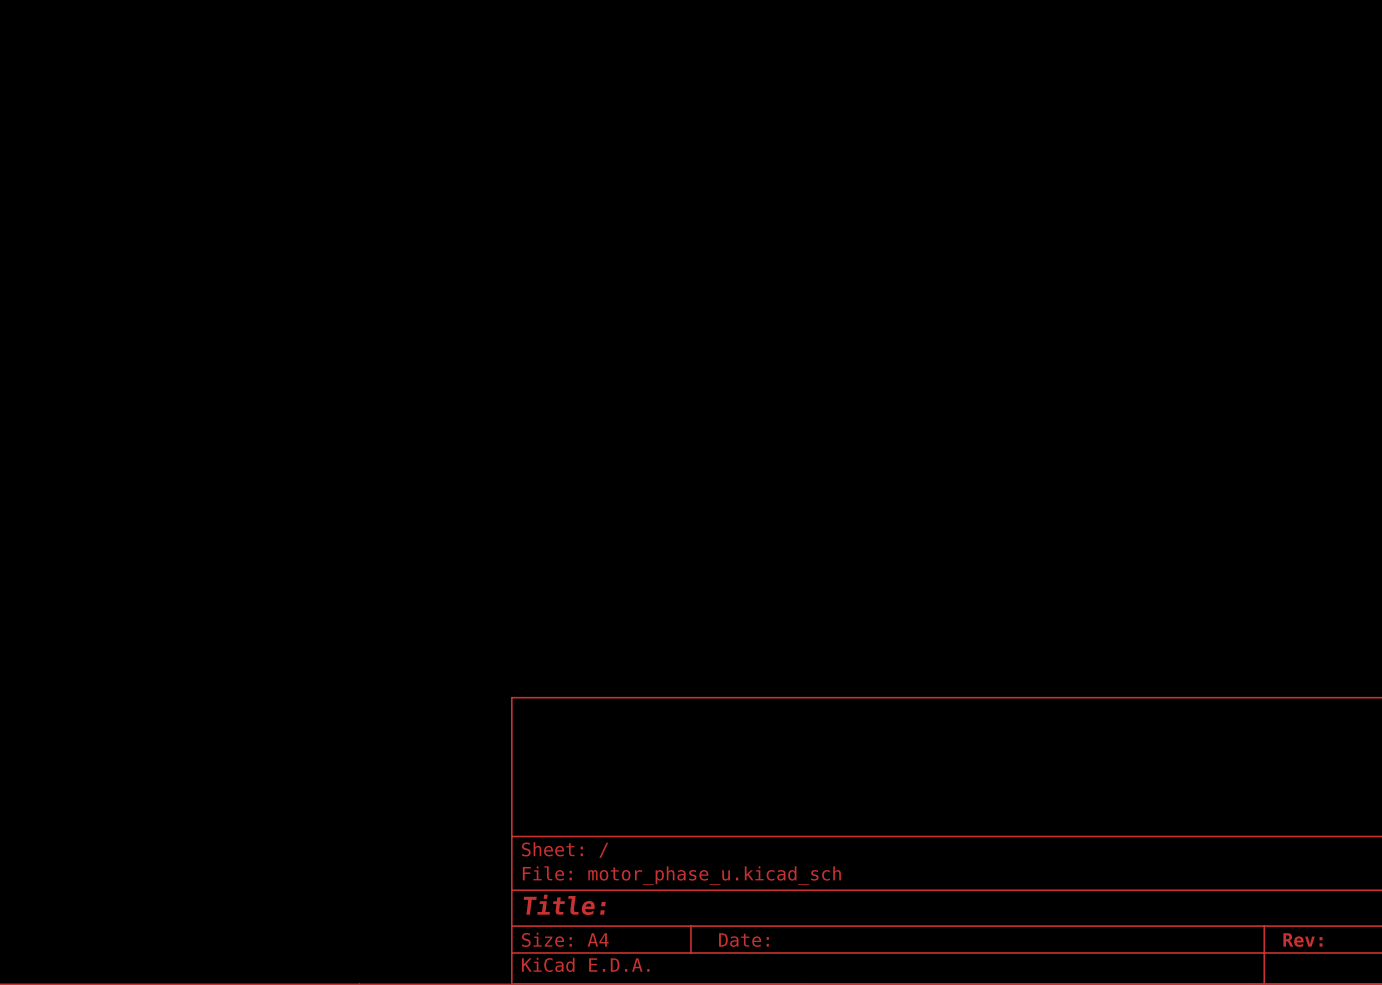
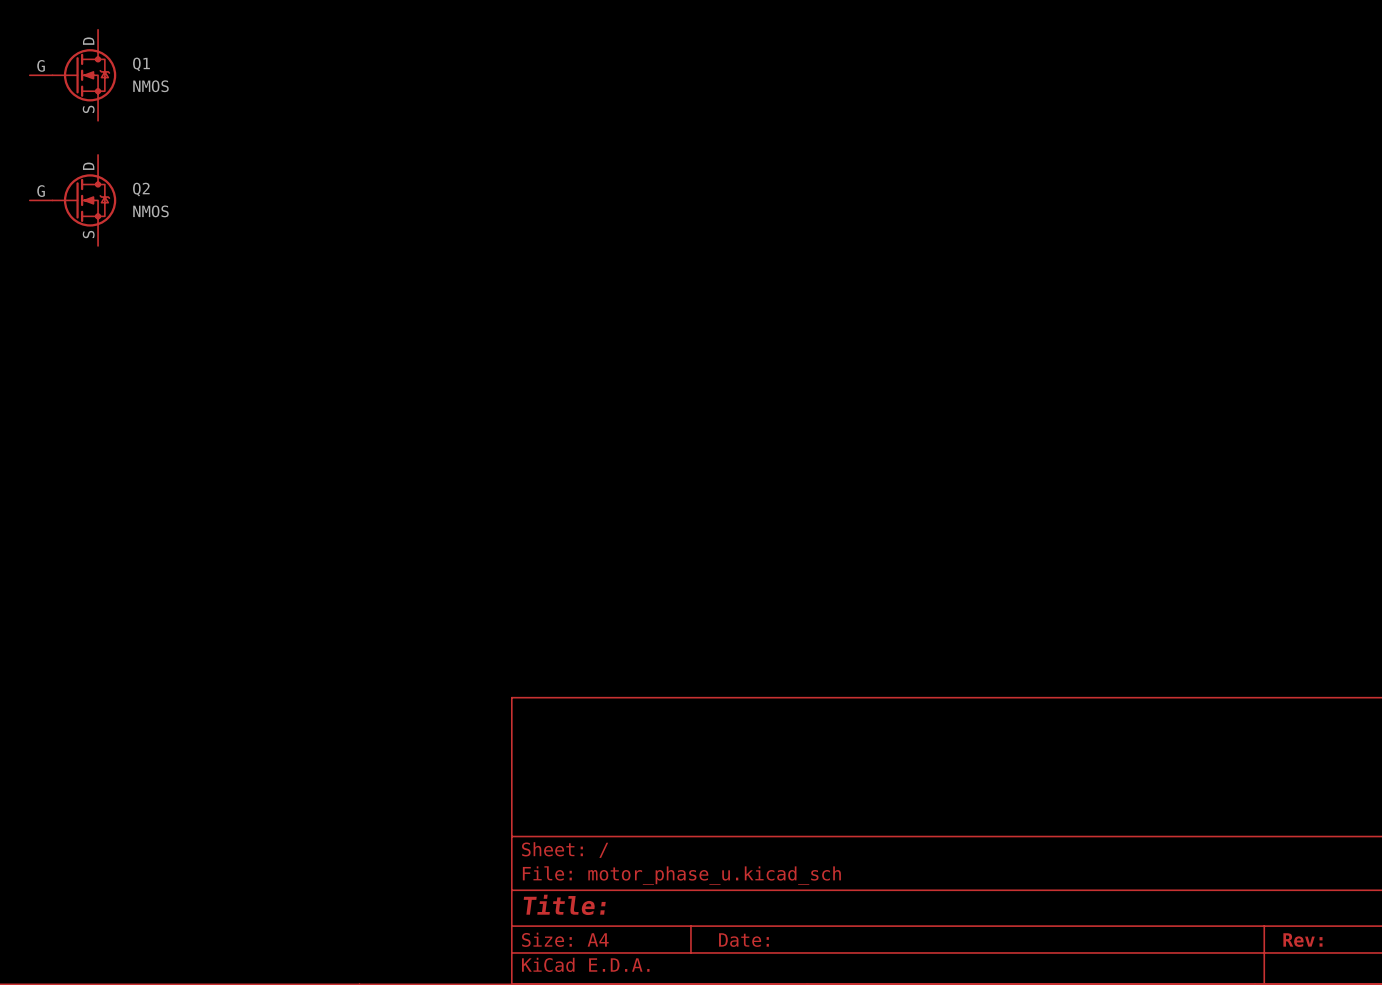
Q1: none -> NMOS (73, 75)
Q2: none -> NMOS (73, 200)

